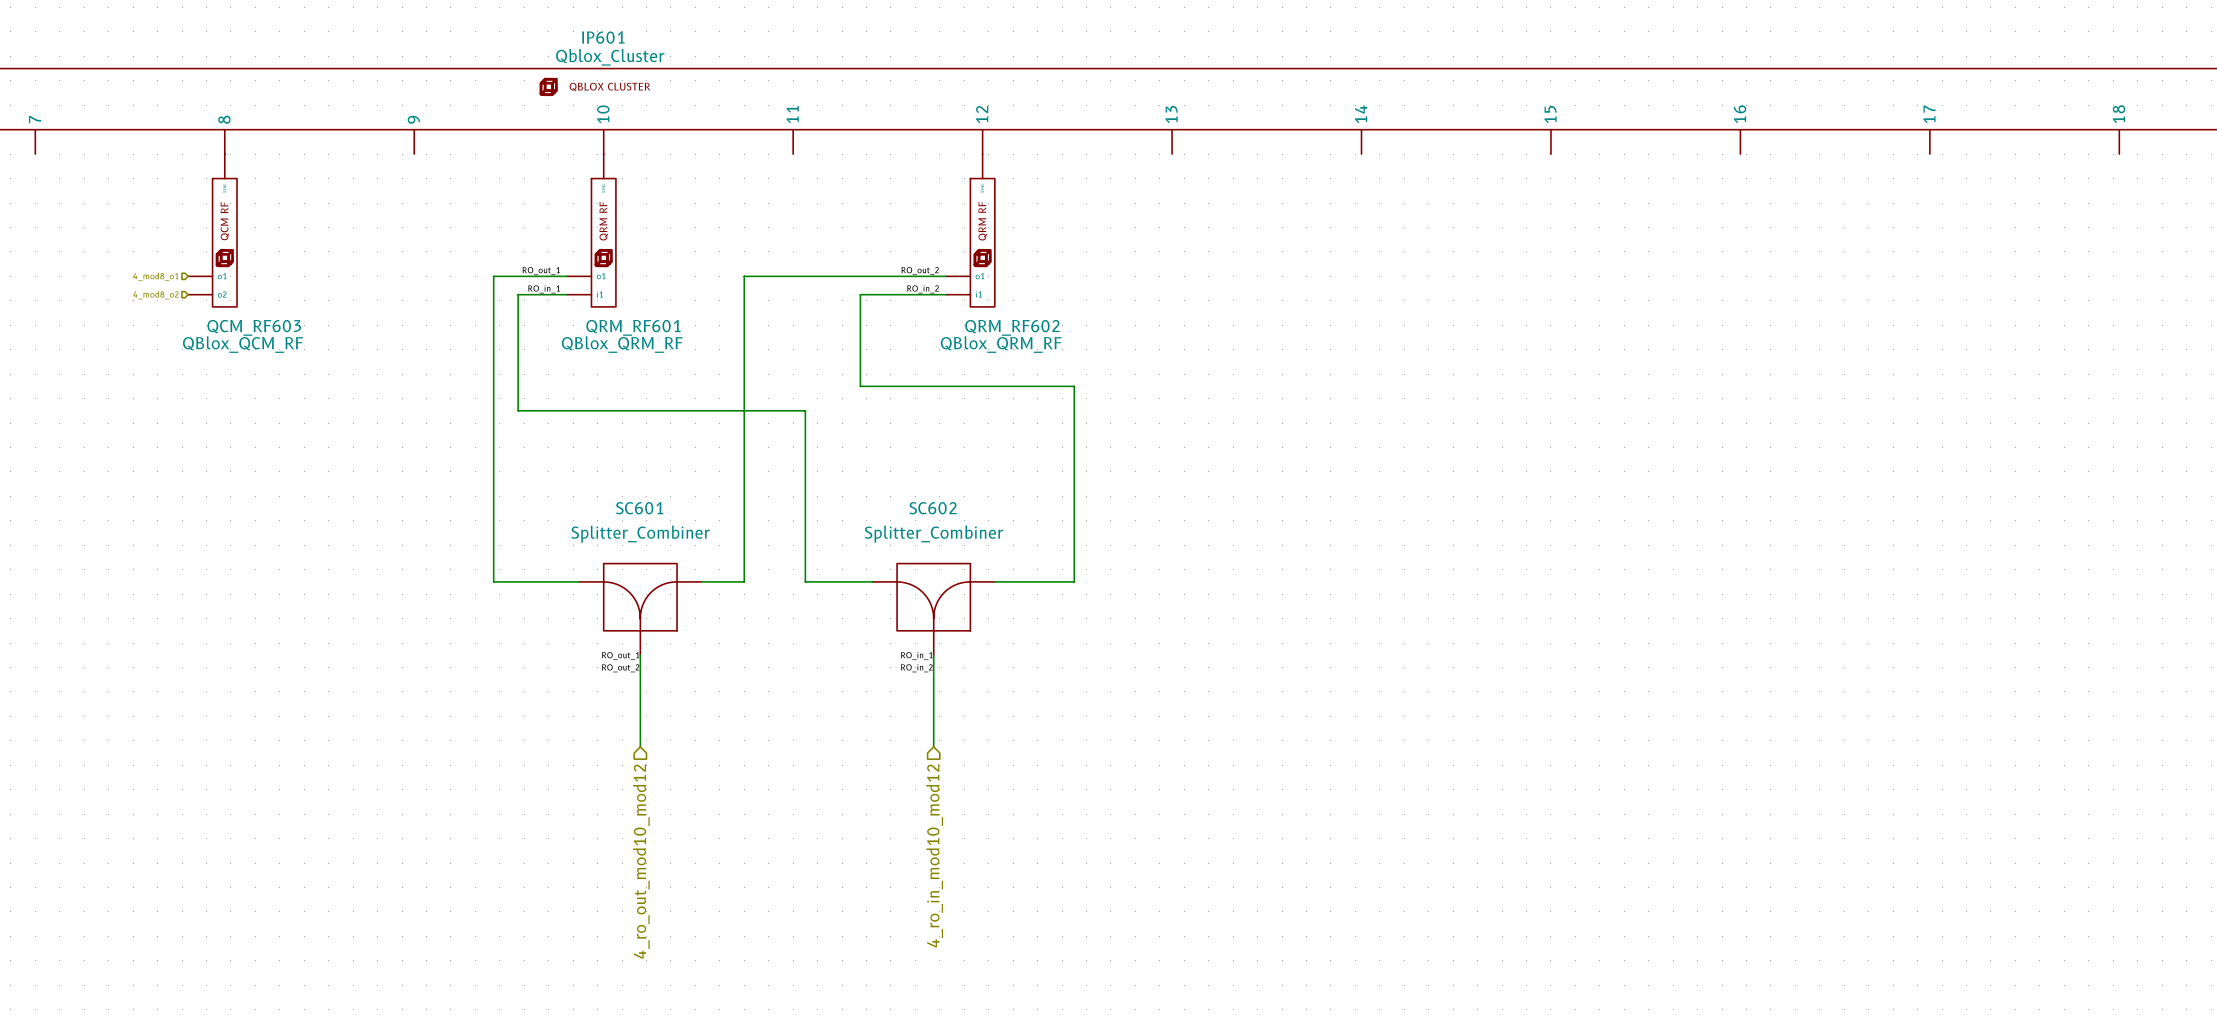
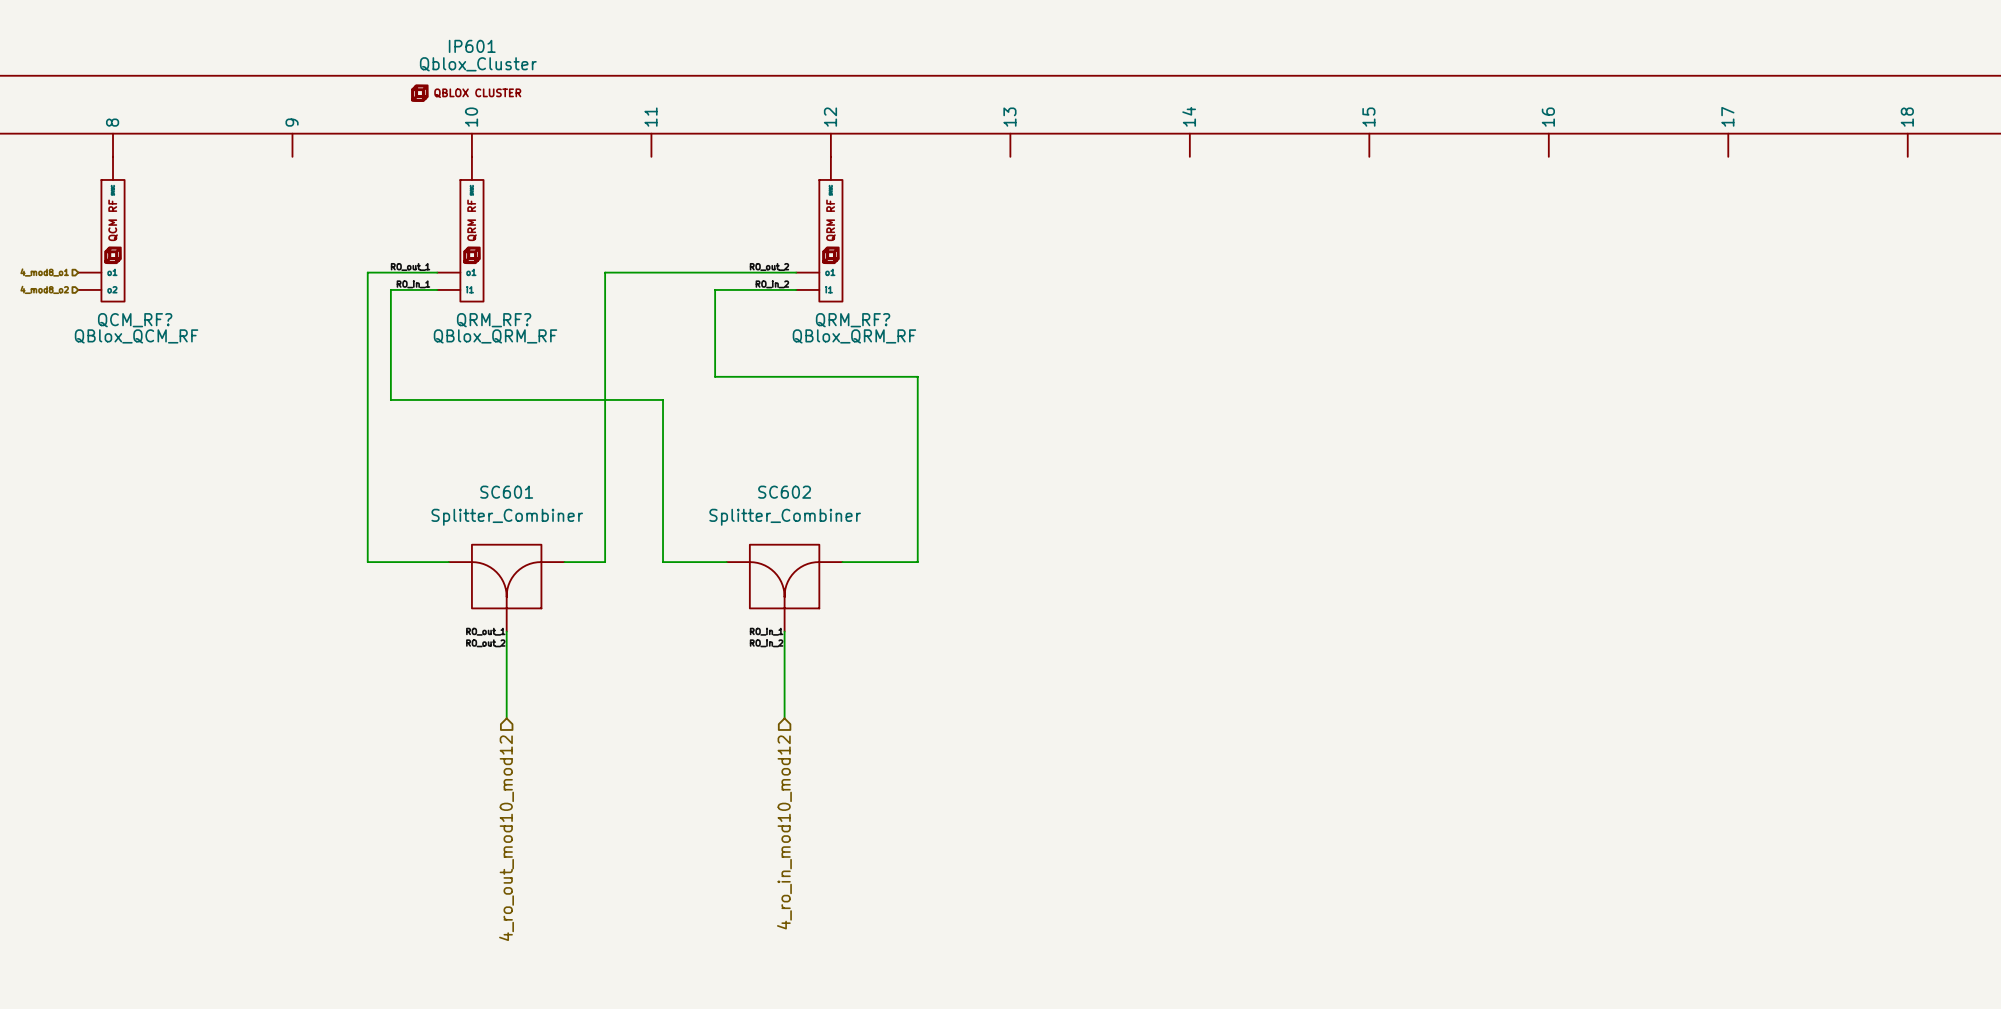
QCM_RF603 name: QCM_RF603 (254, 327) -> QCM_RF? (135, 320)
QRM_RF601 name: QRM_RF601 (633, 327) -> QRM_RF? (494, 320)
QRM_RF602 name: QRM_RF602 (1012, 327) -> QRM_RF? (853, 320)

